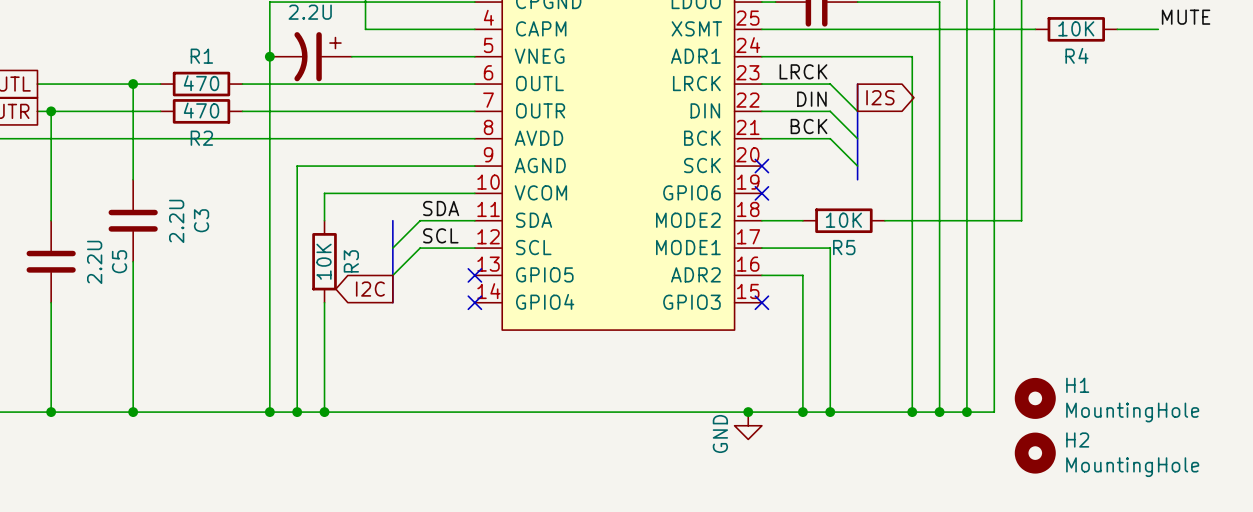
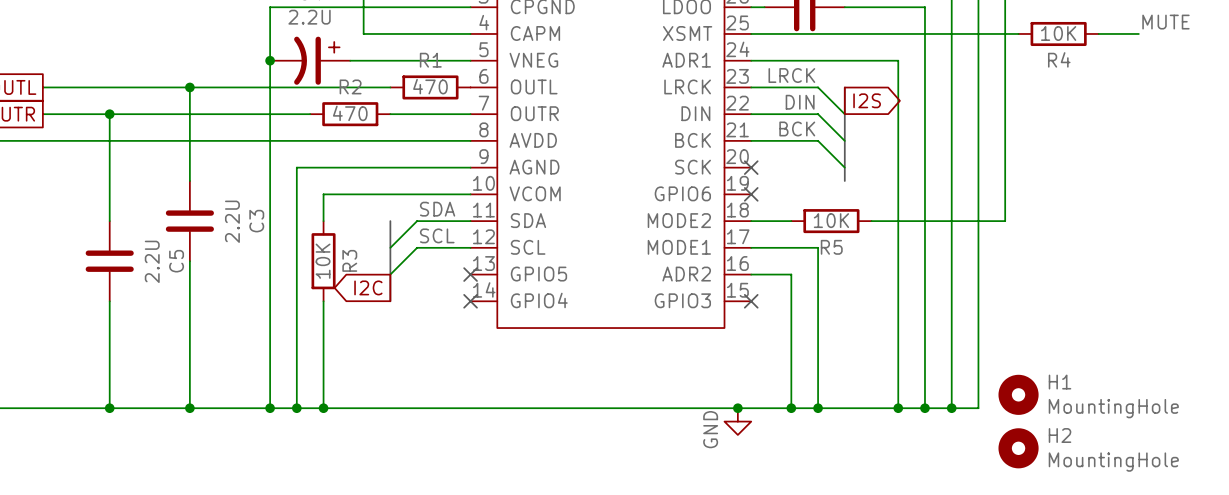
wire: (133, 84) (133, 179) -> (189, 87) (189, 181)
junction: (133, 84) -> none
junction: none -> (189, 87)
R1 position: (201, 84) -> (430, 87)
wire: (392, 84) (474, 84) -> (163, 87) (243, 87)
wire: (51, 111) (51, 220) -> (109, 114) (109, 221)
junction: (51, 111) -> none
junction: none -> (109, 114)
R2 position: (201, 111) -> (350, 114)
wire: (310, 111) (392, 111) -> (163, 114) (243, 114)
R2 name position: R2 (201, 138) -> R2 (350, 86)
C3 position: (133, 220) -> (189, 221)
C5 position: (51, 261) -> (109, 261)
wire: (133, 261) (133, 412) -> (189, 261) (189, 408)
wire: (51, 302) (51, 412) -> (109, 301) (109, 408)
junction: (51, 412) -> none
junction: none -> (109, 408)
junction: (133, 412) -> none
junction: none -> (189, 408)

